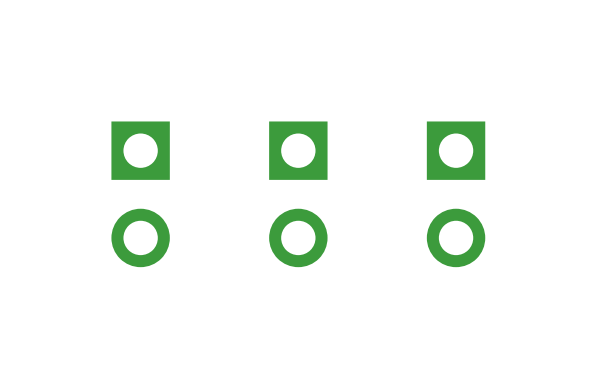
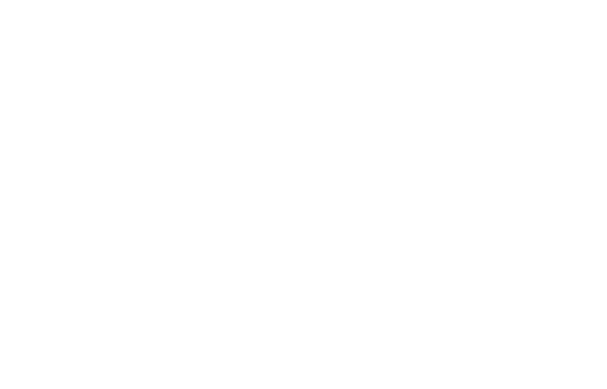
part: (140, 194) -> none
part: (298, 194) -> none
part: (456, 194) -> none

